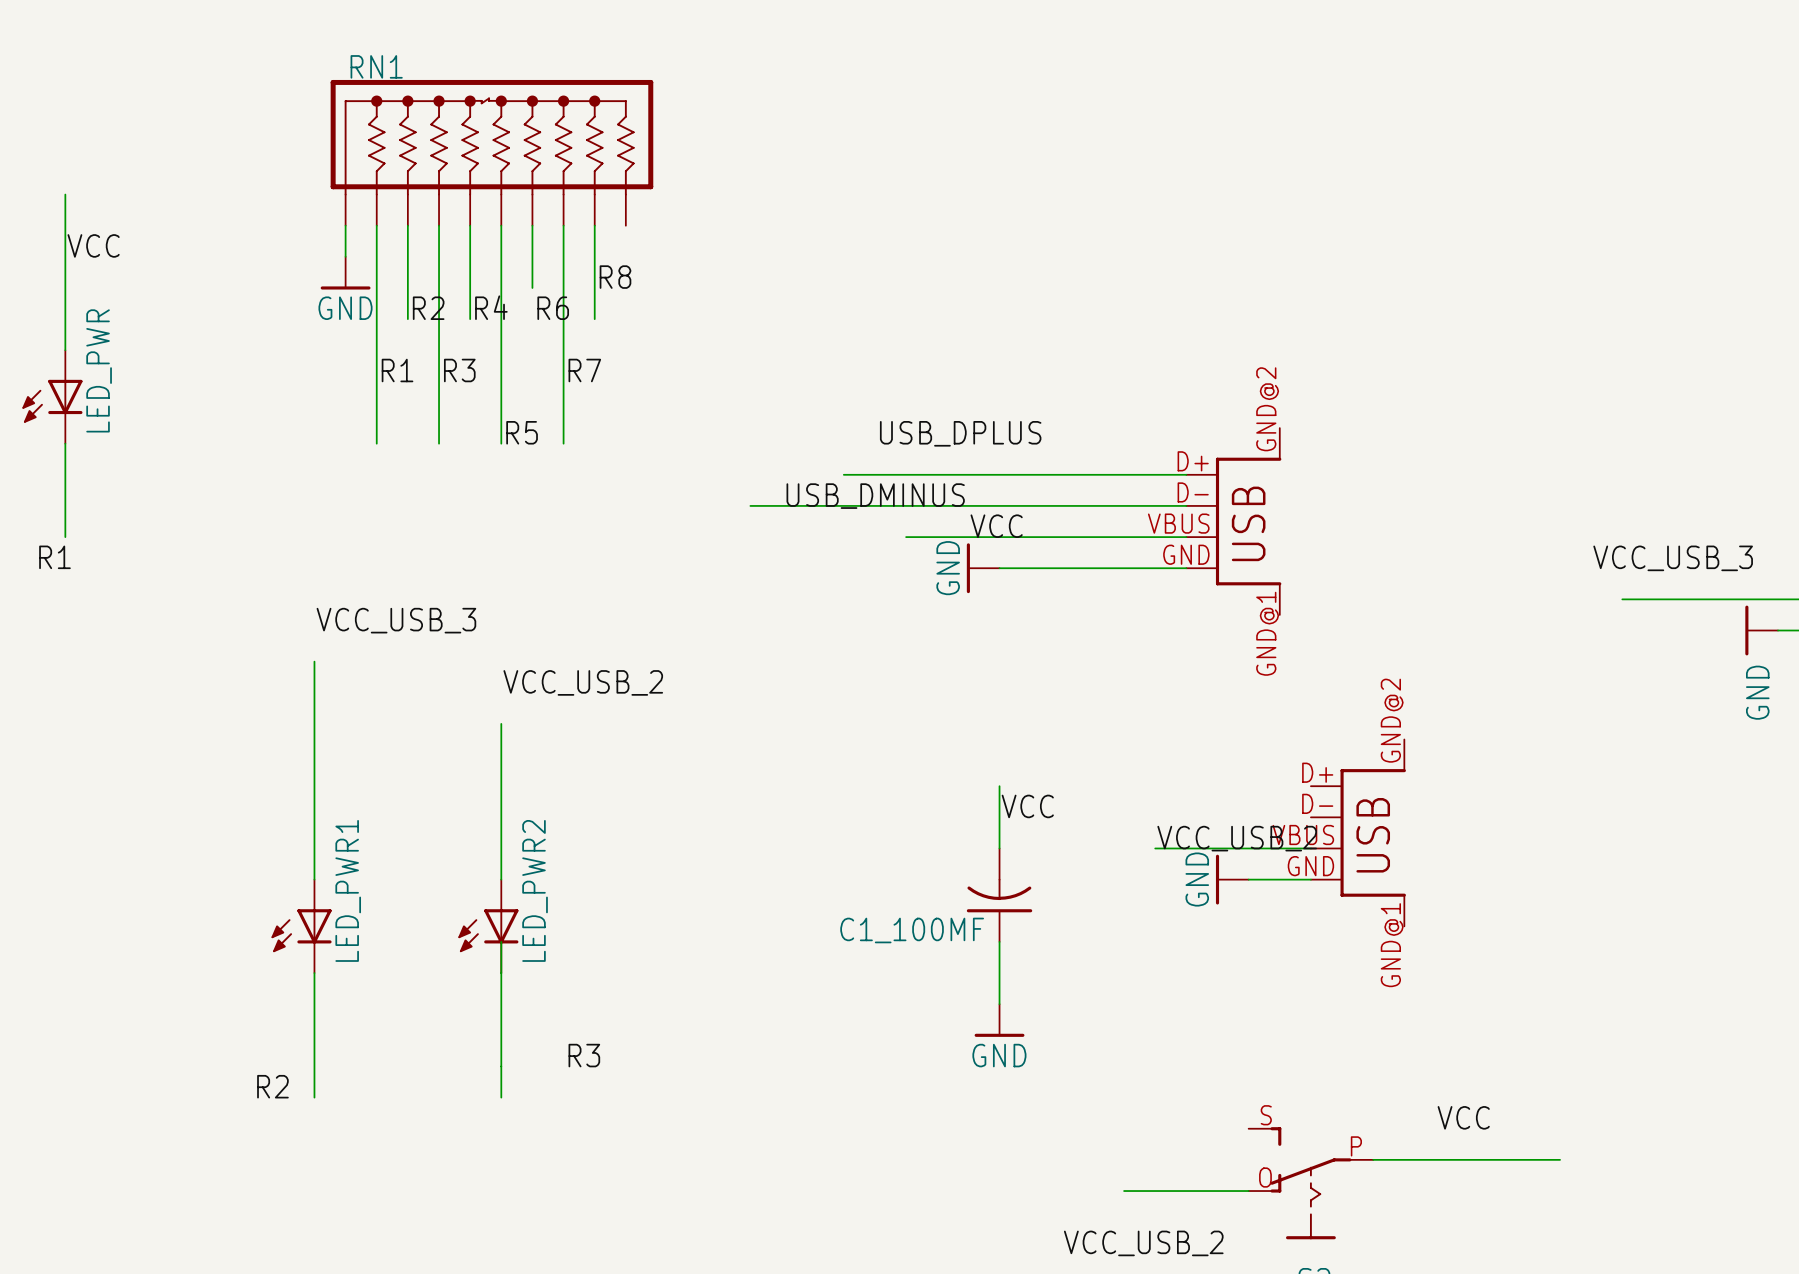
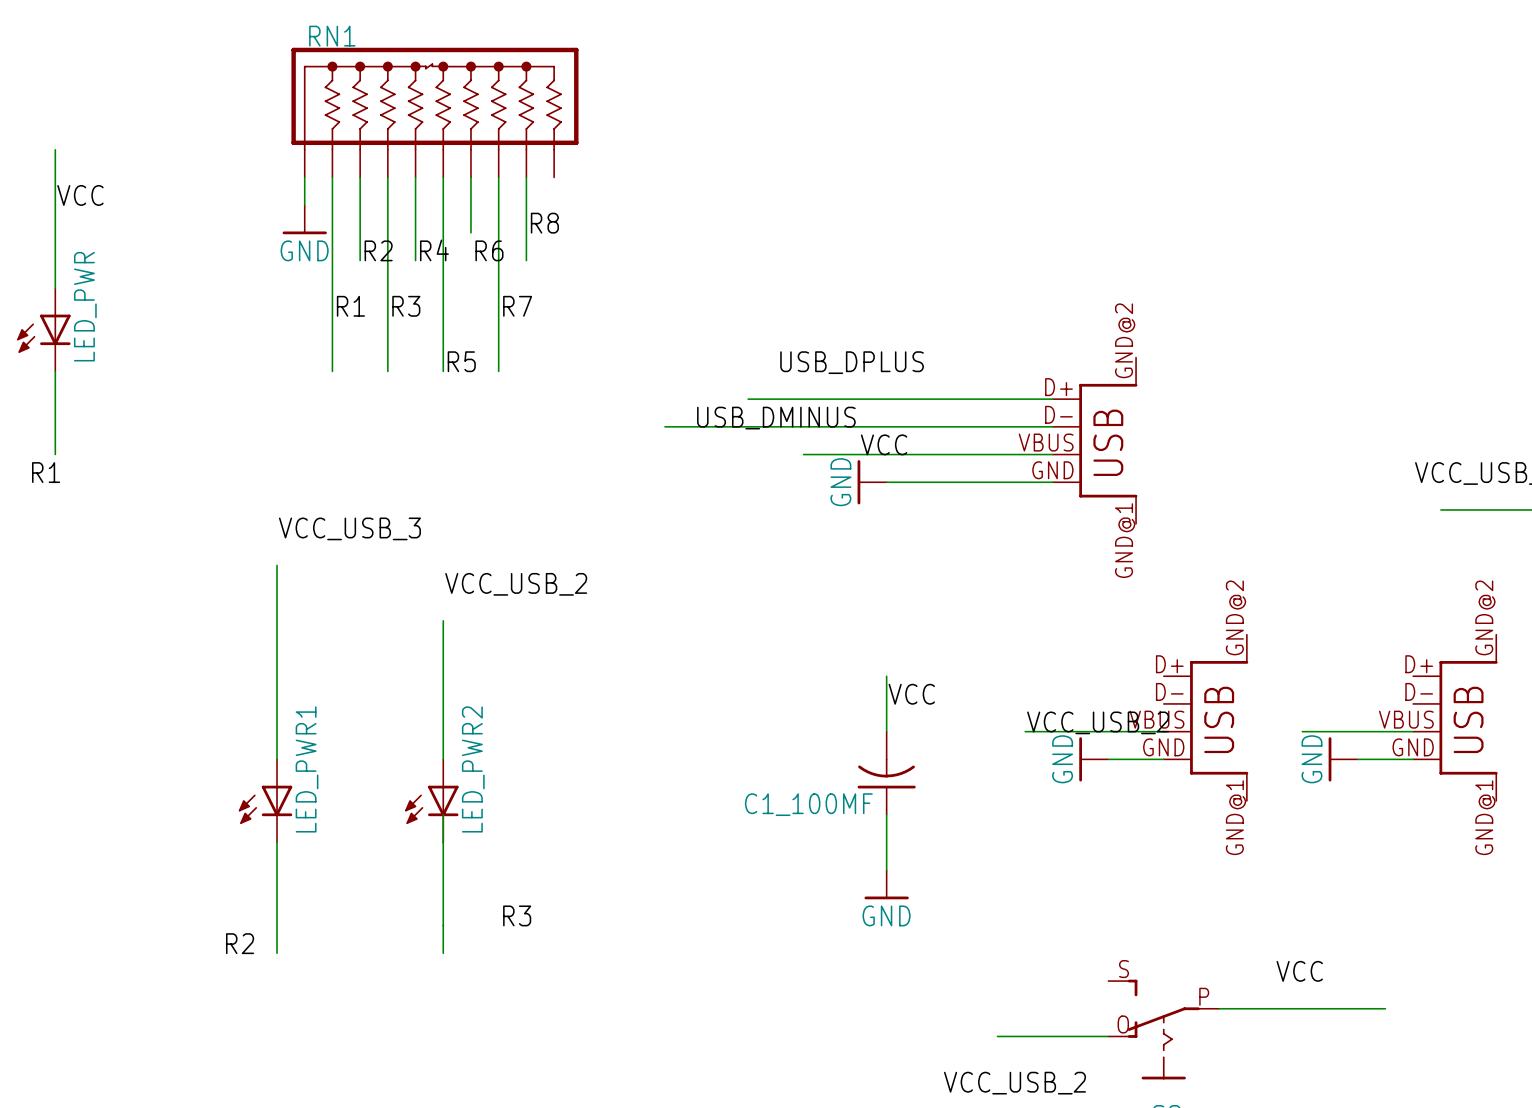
part: none -> (1455, 717)
wire: none -> (1302, 731) (1413, 731)
power symbol: none -> GND (1343, 759)
wire: none -> (1357, 759) (1413, 759)

